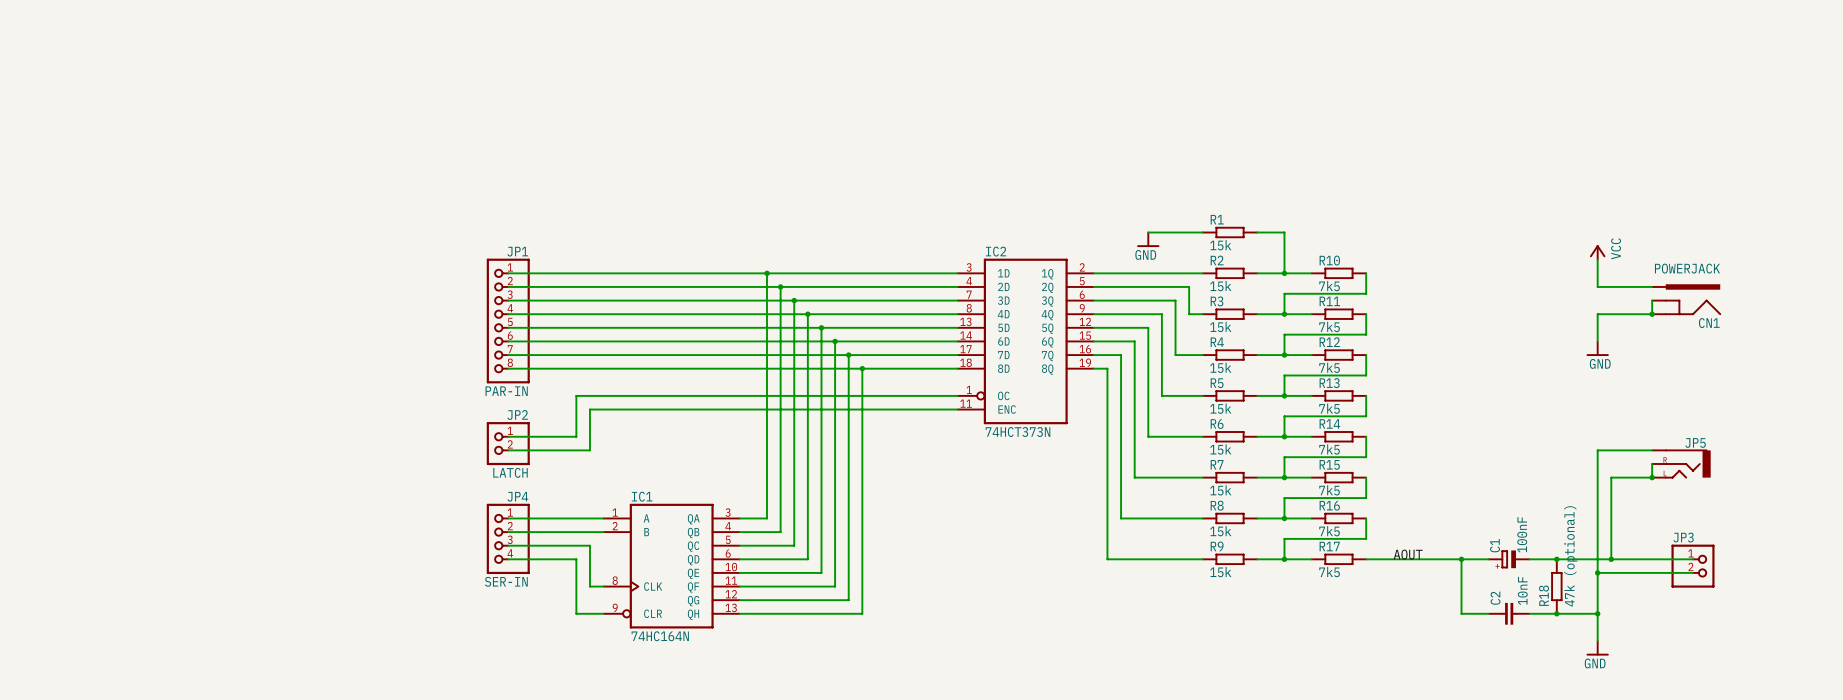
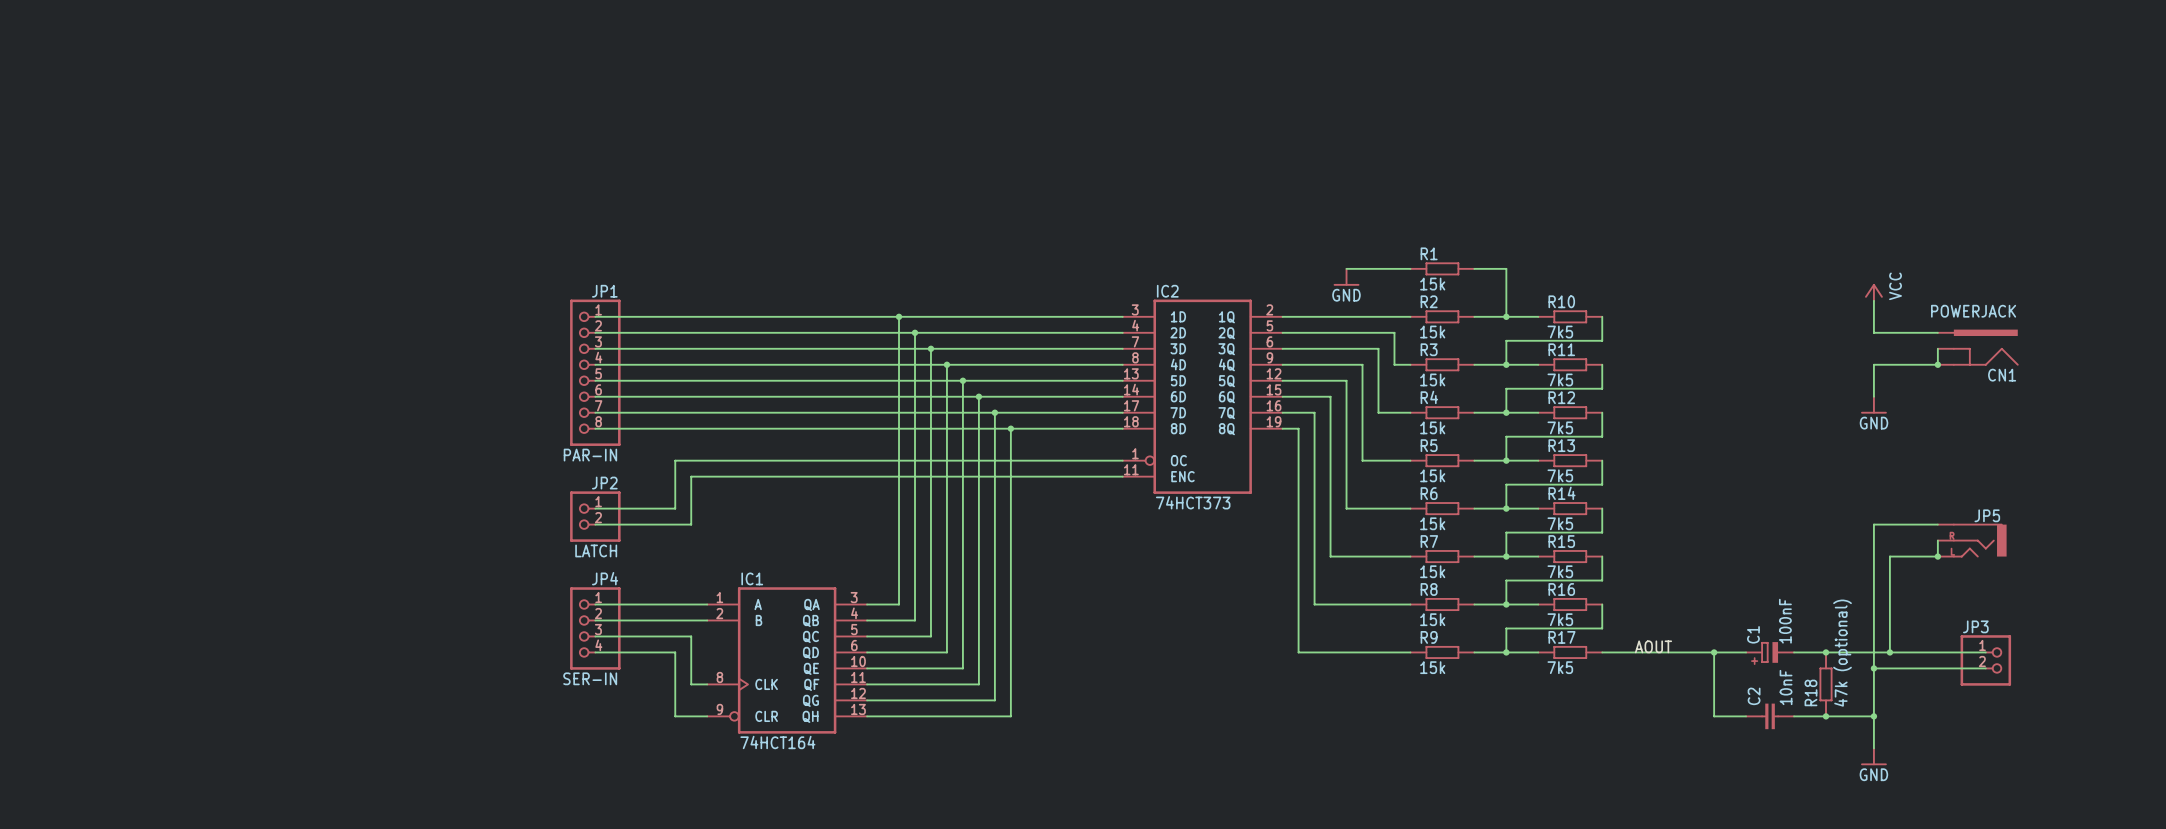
IC2 value: 74HCT373N (1017, 432) -> 74HCT373 (1193, 502)
IC1 value: 74HC164N (660, 636) -> 74HCT164 (777, 742)

